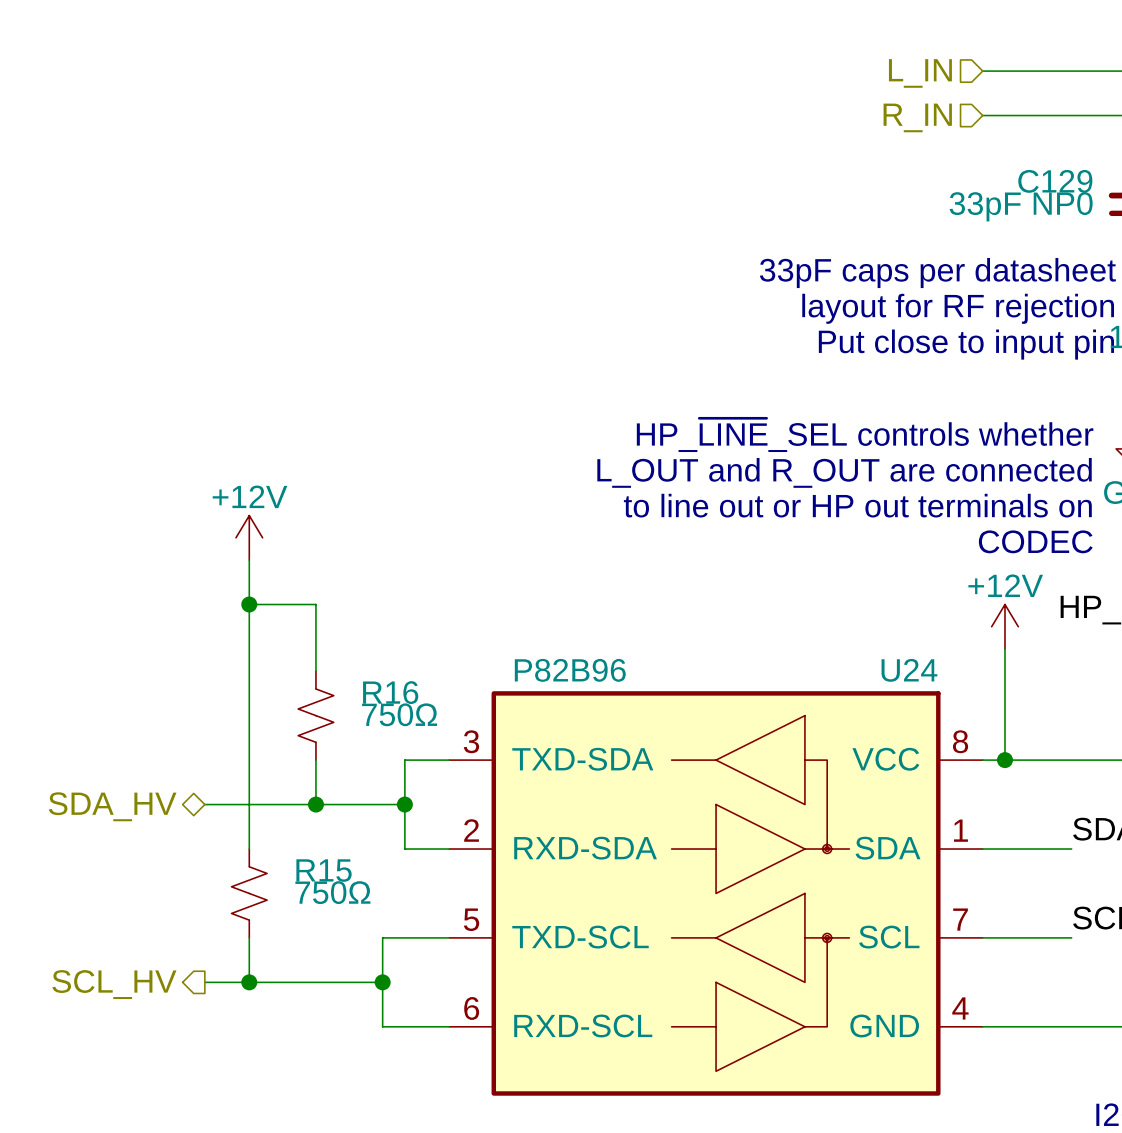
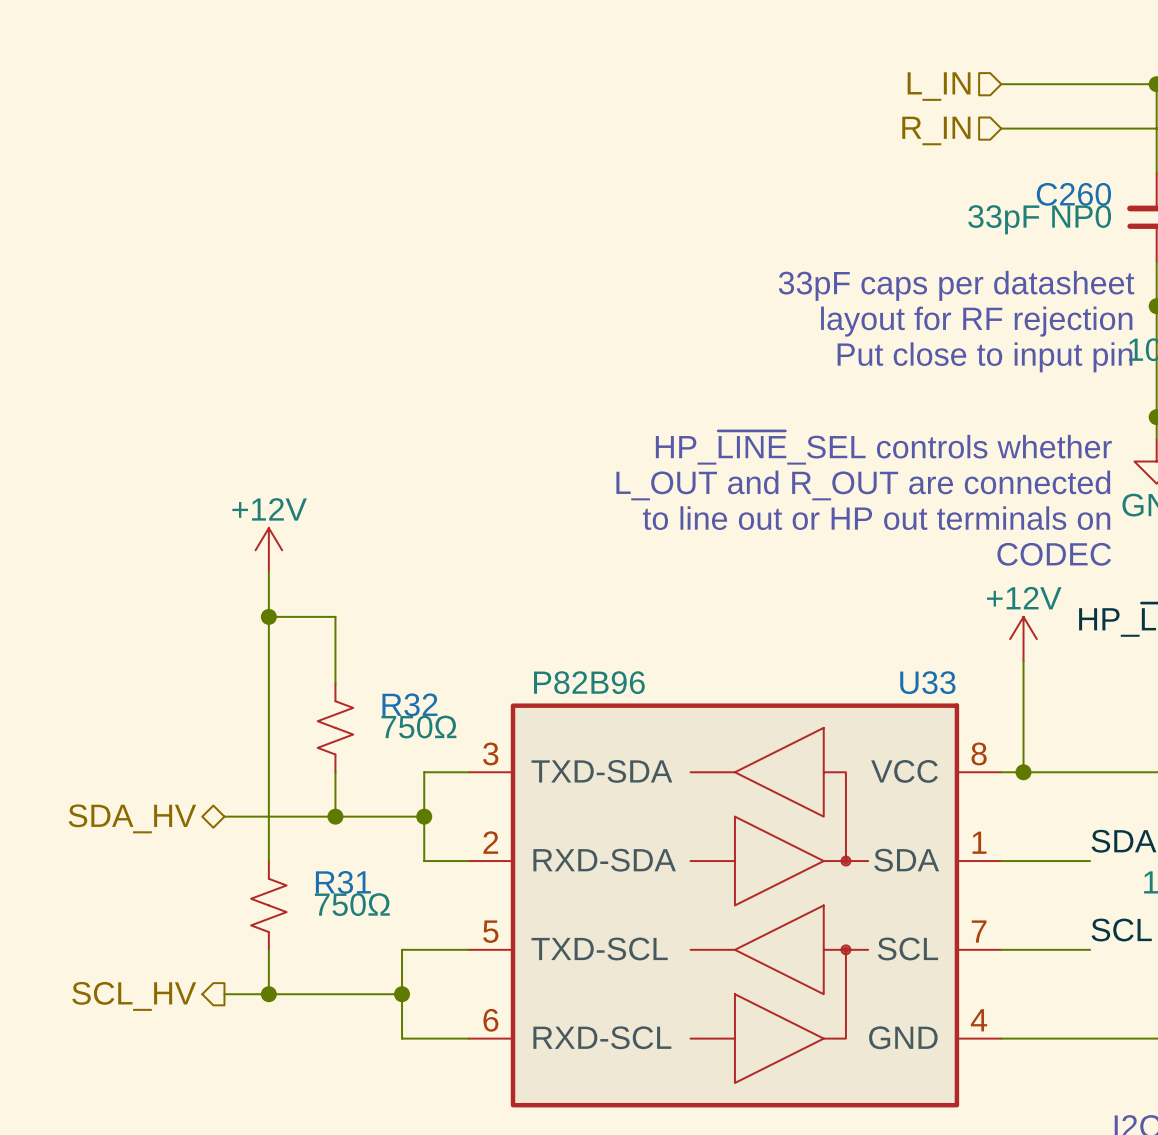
C129 name: C129 (1055, 181) -> C260 (1073, 194)
U24 name: U24 (909, 670) -> U33 (927, 682)
R16 name: R16 (390, 692) -> R32 (409, 704)
R15 name: R15 (324, 870) -> R31 (343, 882)

